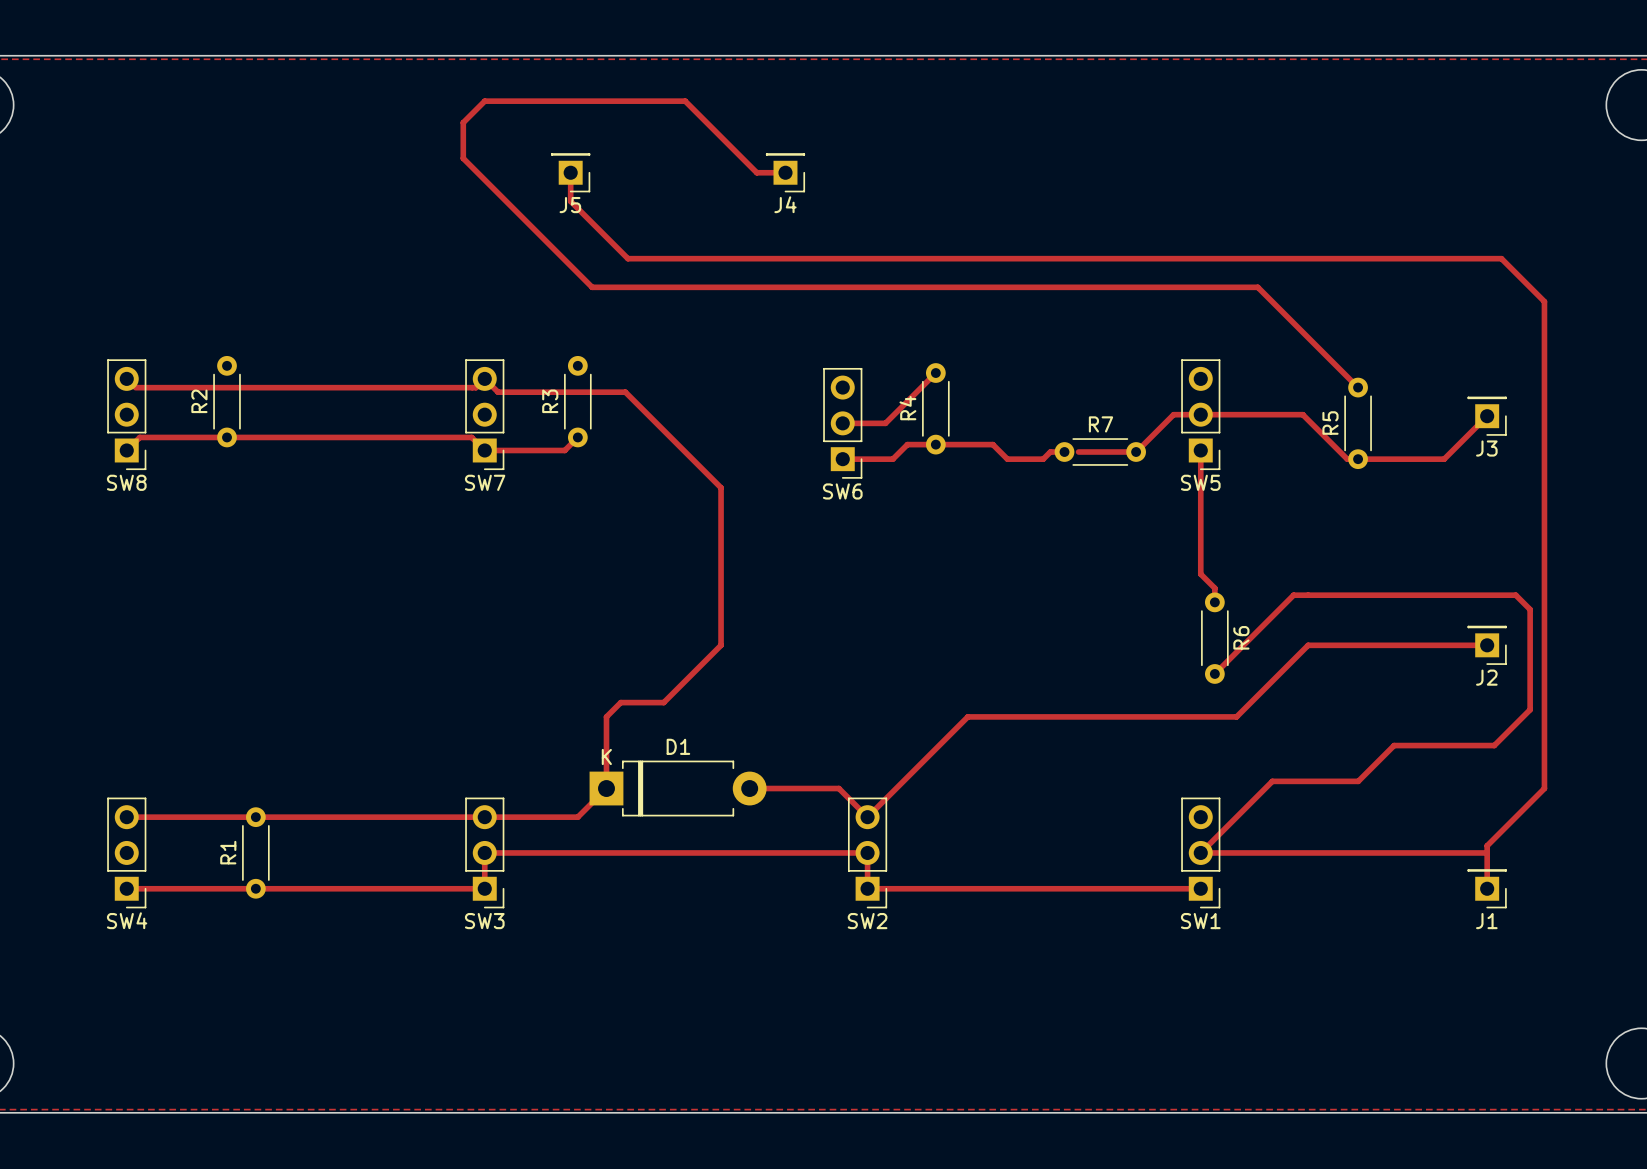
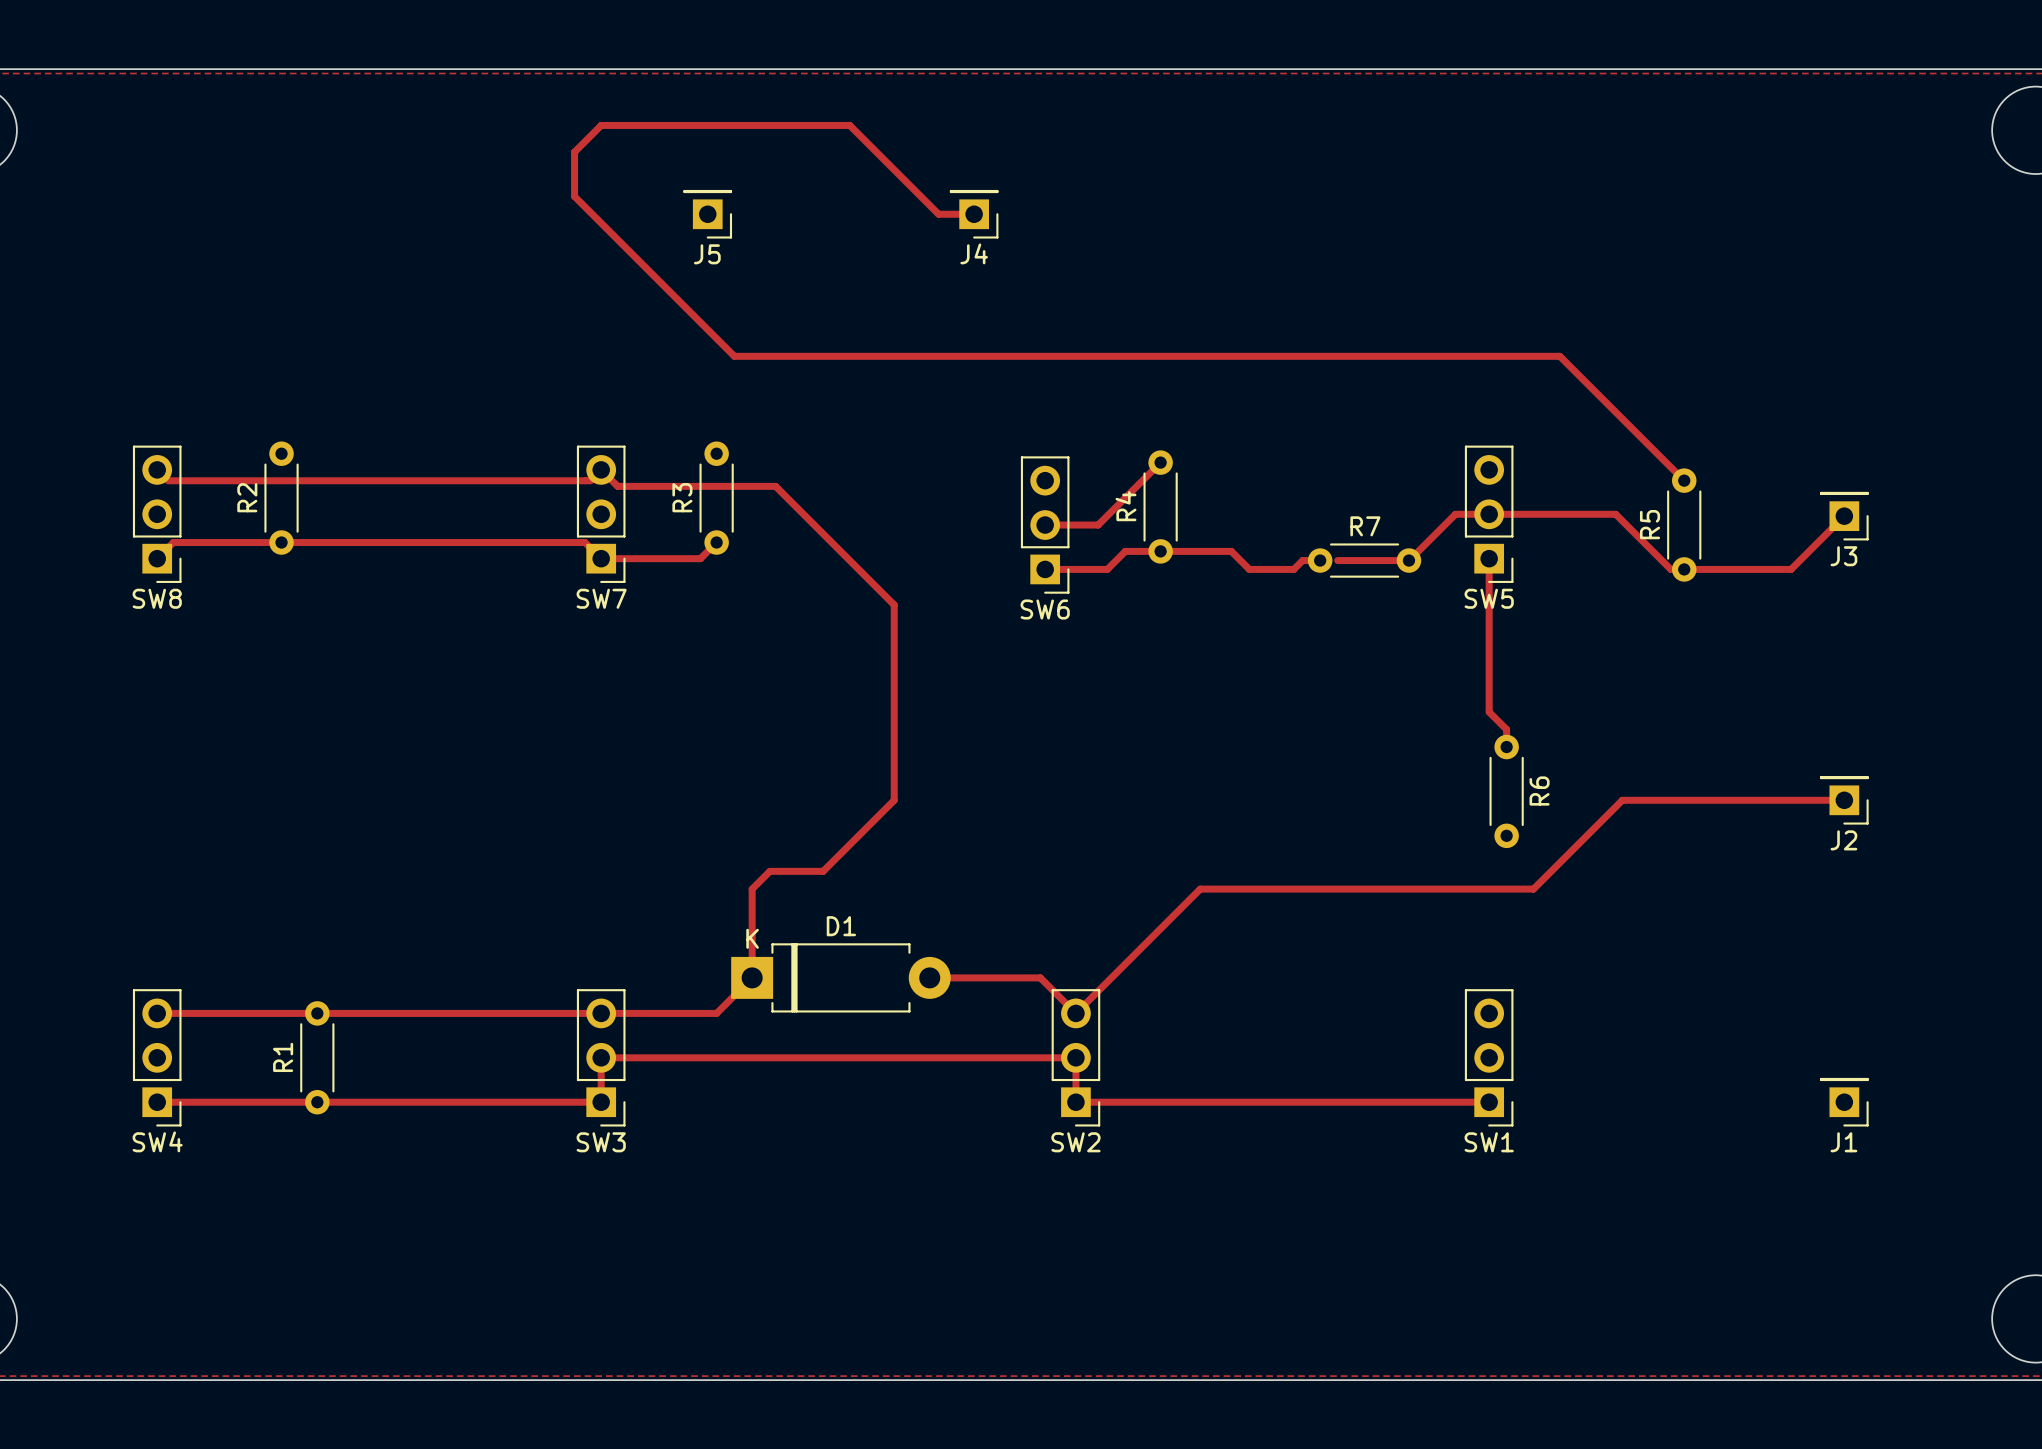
track: (570, 172) (570, 201) (627, 258) (1501, 258) (1544, 301) (1544, 788) (1487, 845) (1487, 888) -> none
track: (1214, 673) (1293, 595) (1515, 595) (1530, 609) (1530, 709) (1494, 745) (1394, 745) (1358, 781) (1272, 781) (1200, 852) (1487, 852) -> none

